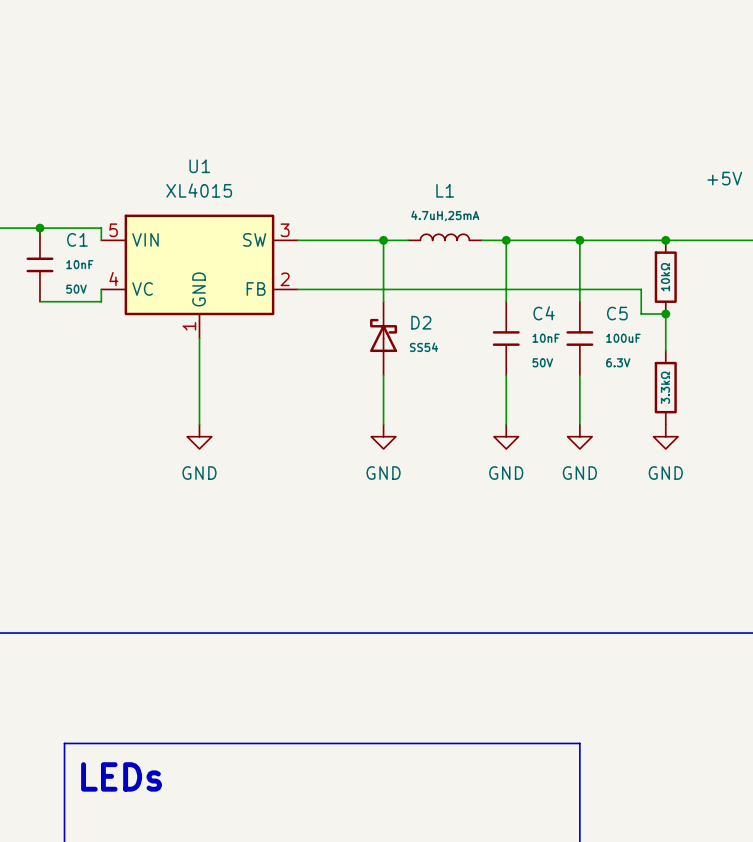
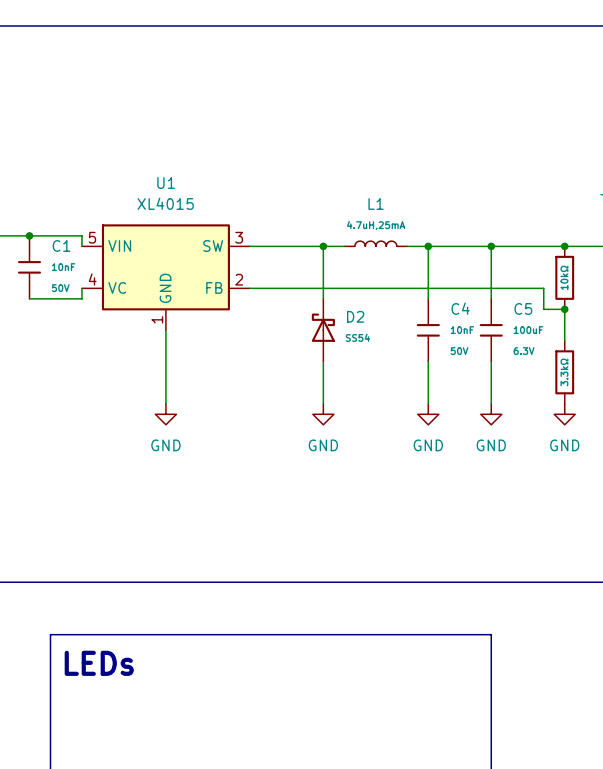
line: (64, 743) (579, 743) -> (50, 676) (50, 634) (491, 634) (491, 676)
text position: LEDs (121, 776) -> LEDs (99, 663)

